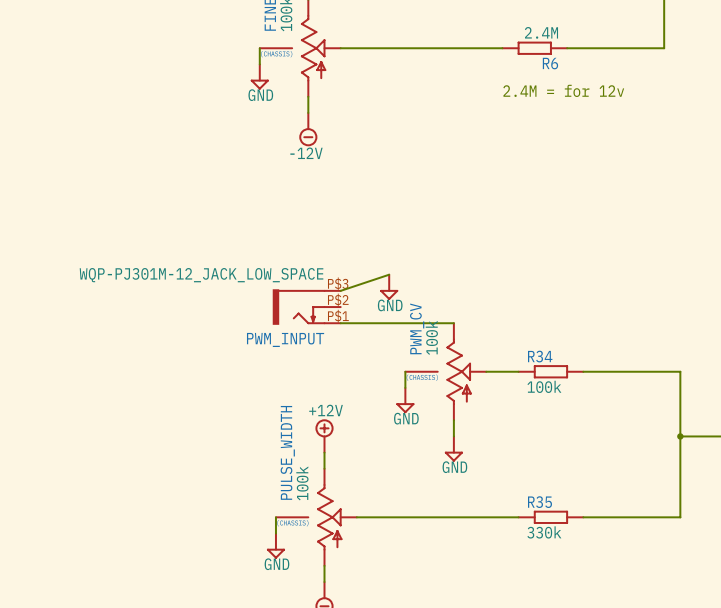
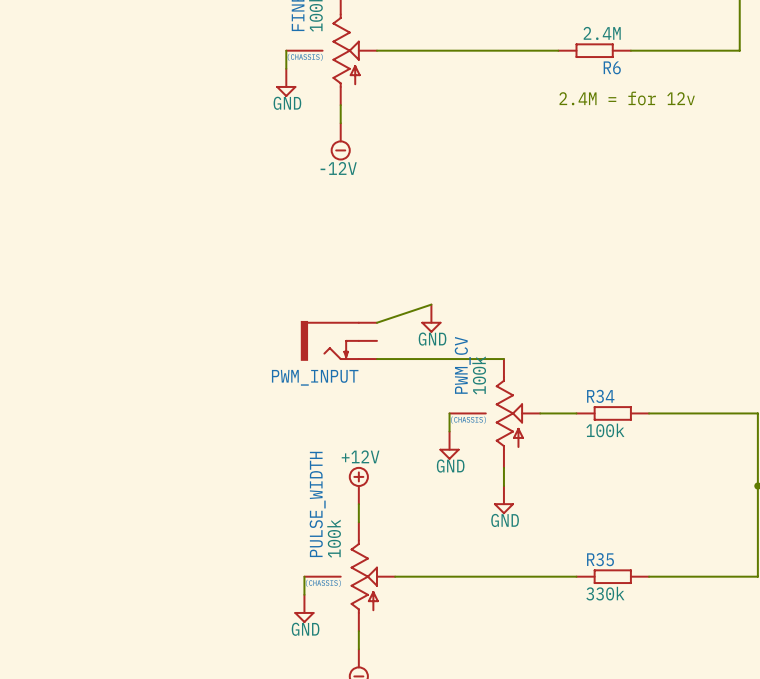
PWM_INPUT value: WQP-PJ301M-12_JACK_LOW_SPACE (201, 275) -> none
PWM_INPUT pin number: P$3 (338, 283) -> none
PWM_INPUT pin number: P$2 (338, 300) -> none
PWM_INPUT pin number: P$1 (338, 316) -> none

